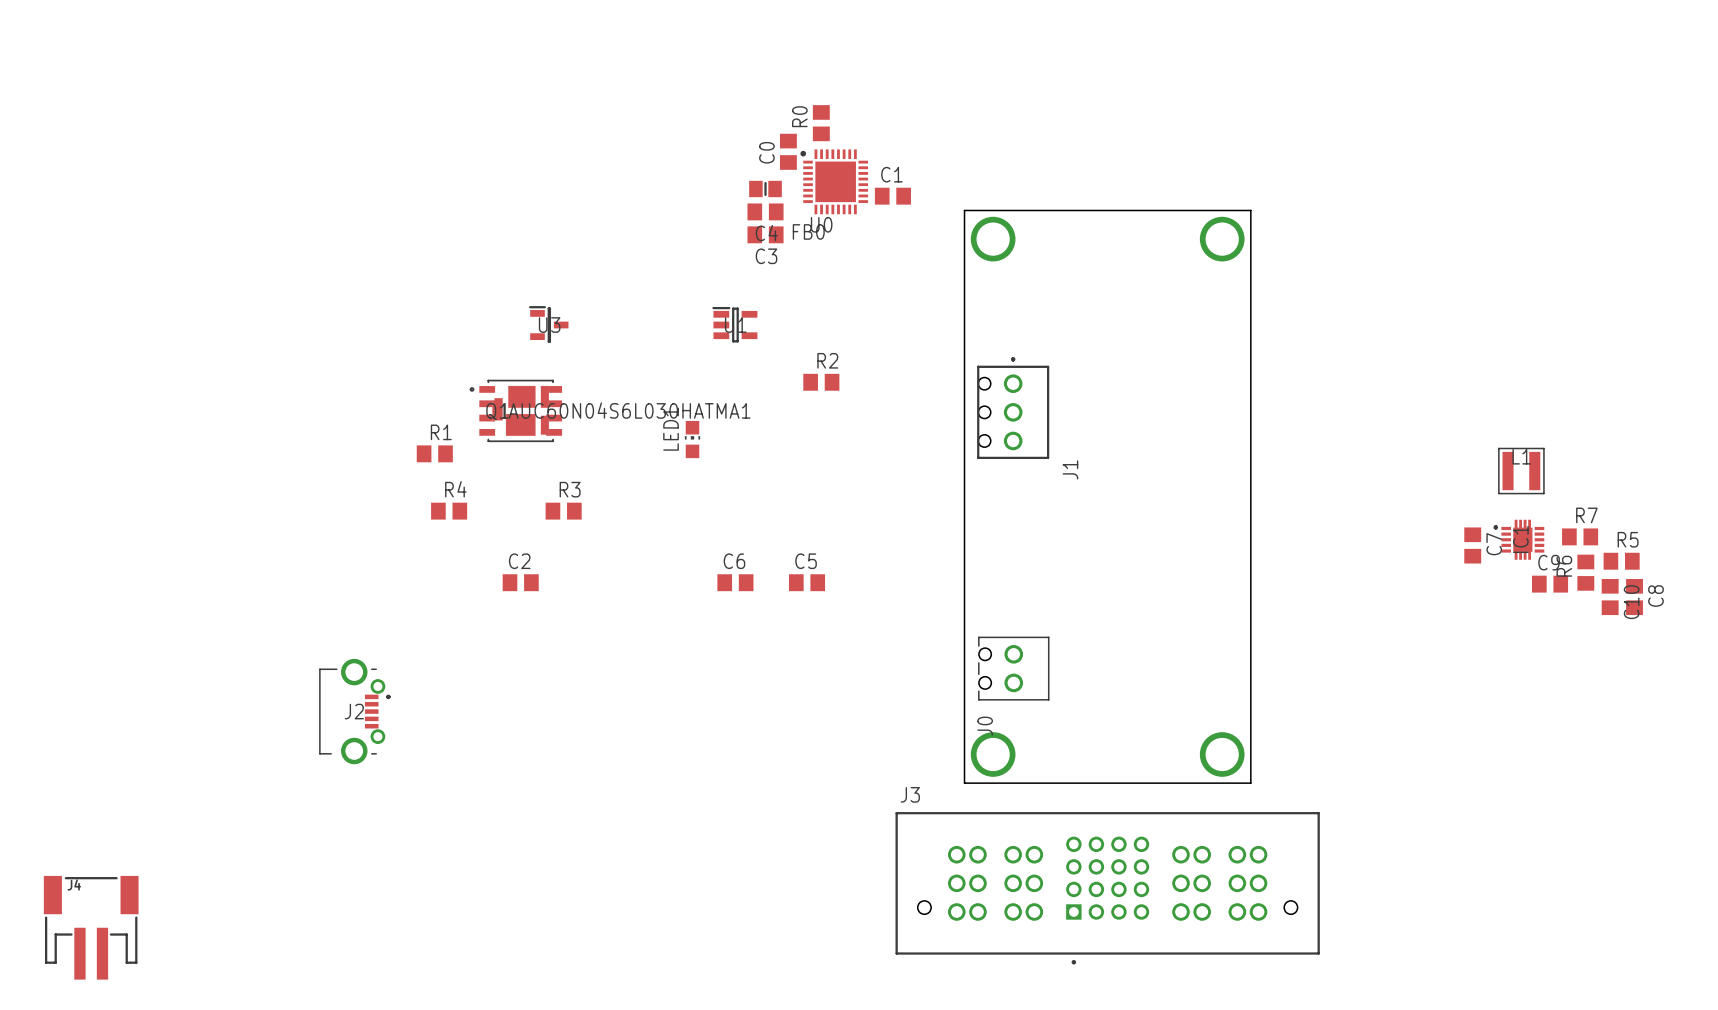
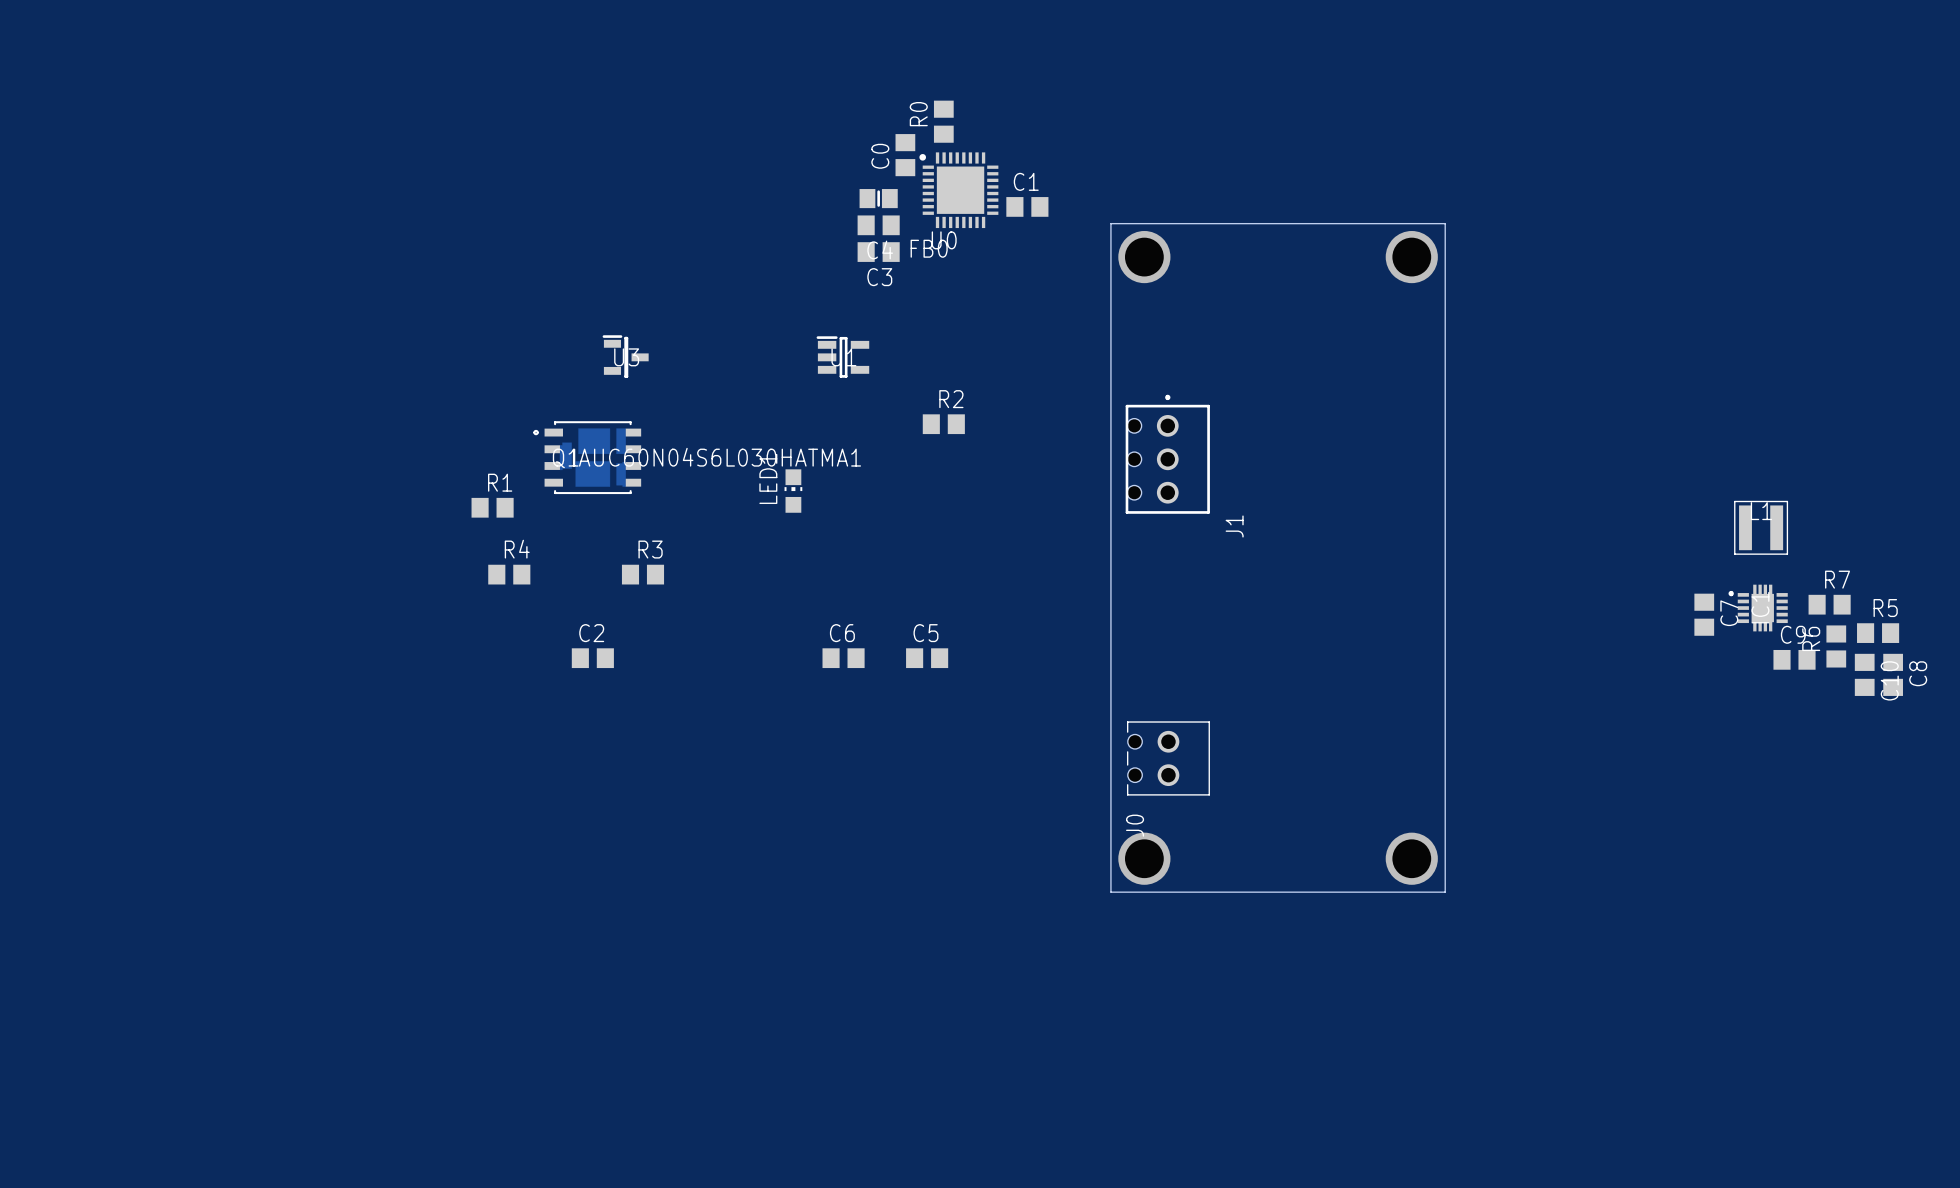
J2: (354, 711) -> none
J3: (1107, 888) -> none
J4: (91, 927) -> none

